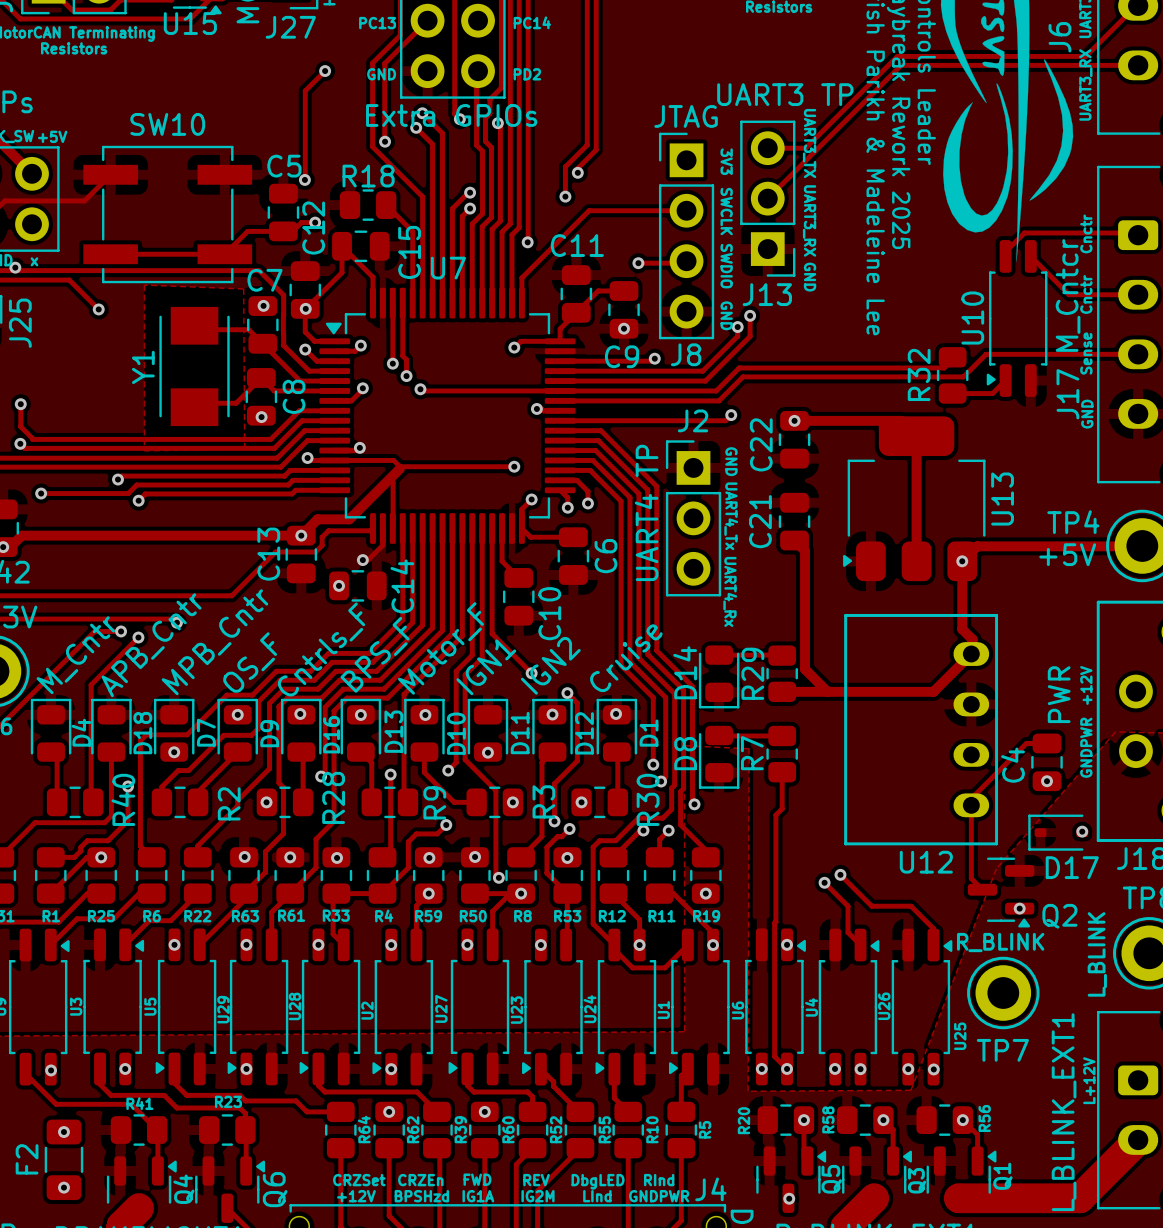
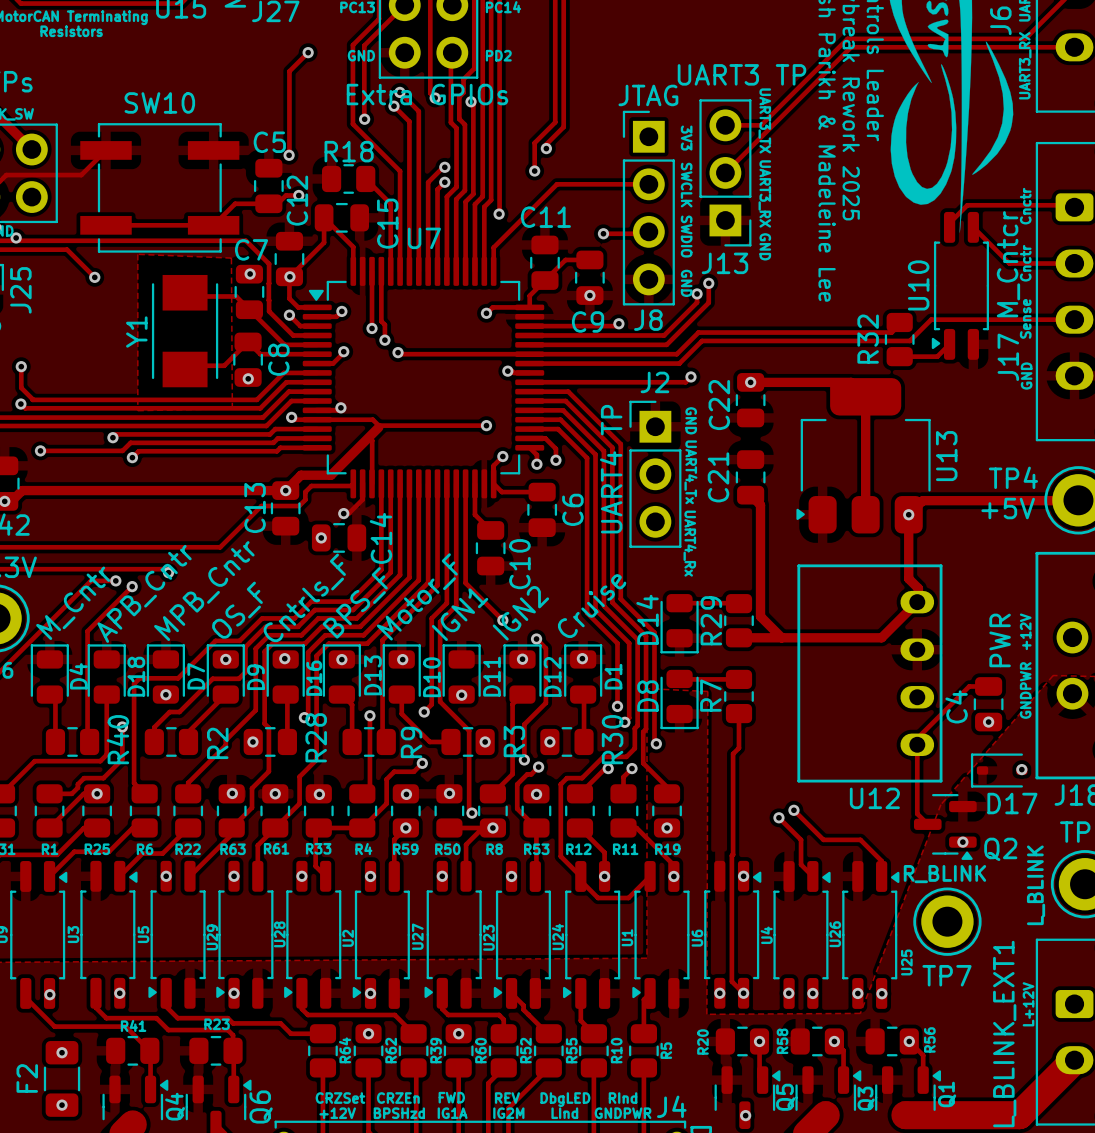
text: +5V (52, 136) -> none
text: x (34, 261) -> none

